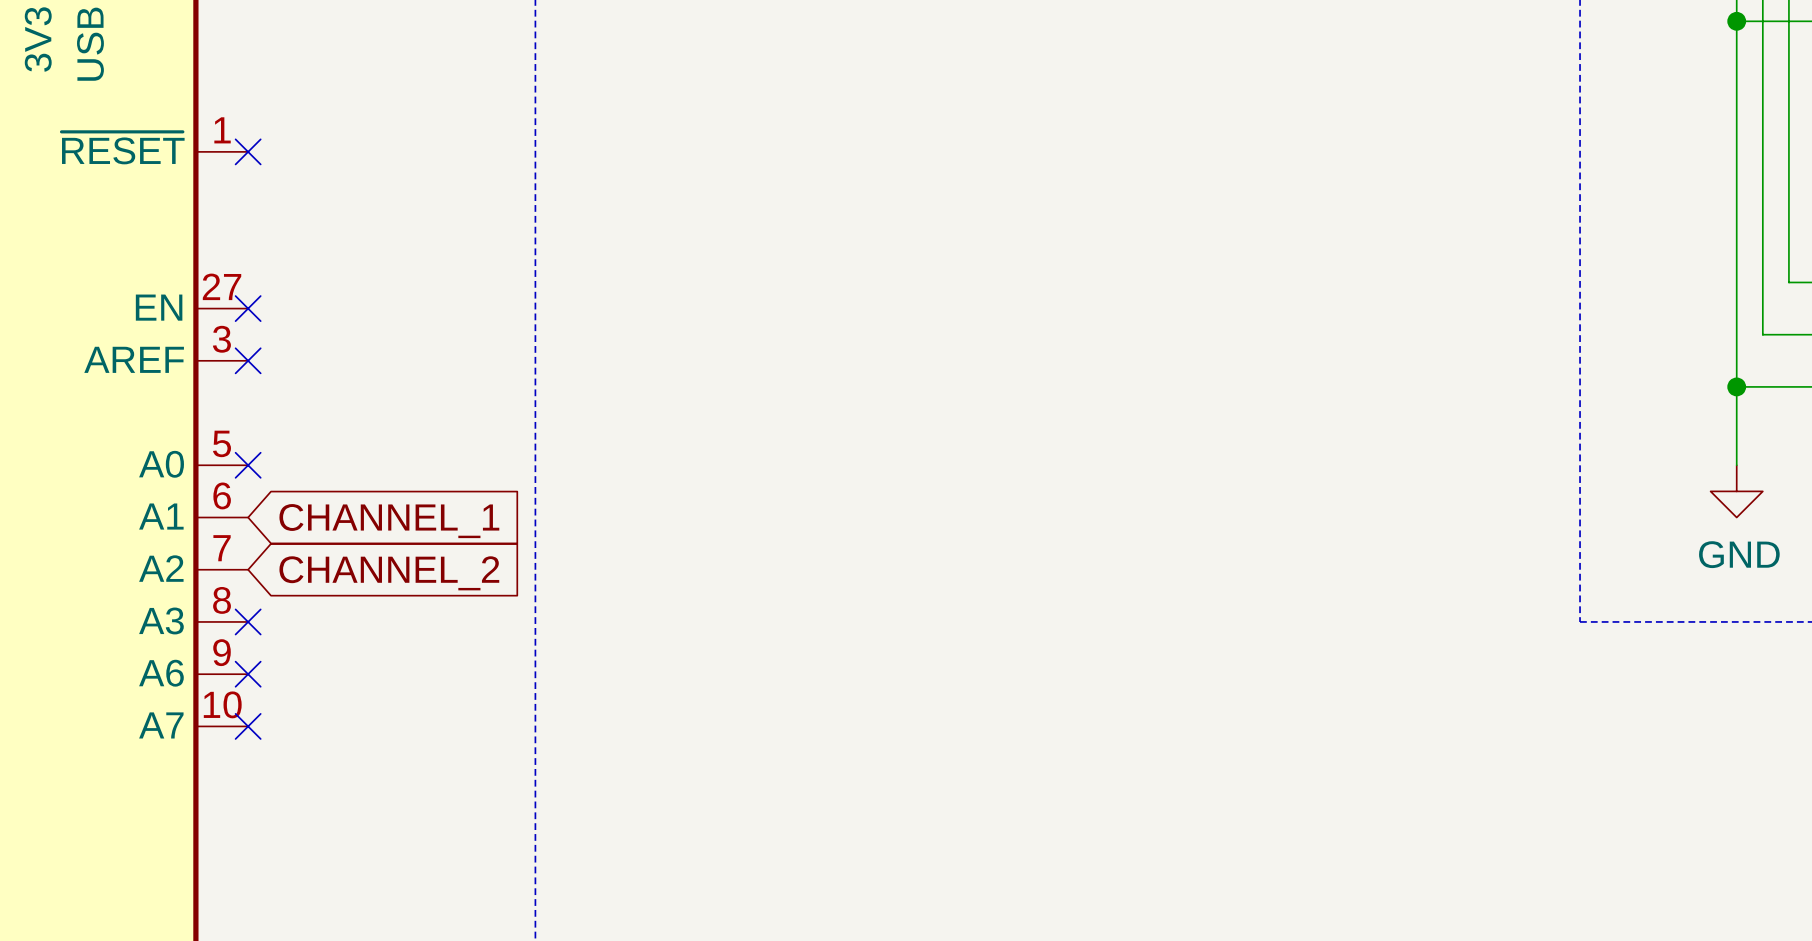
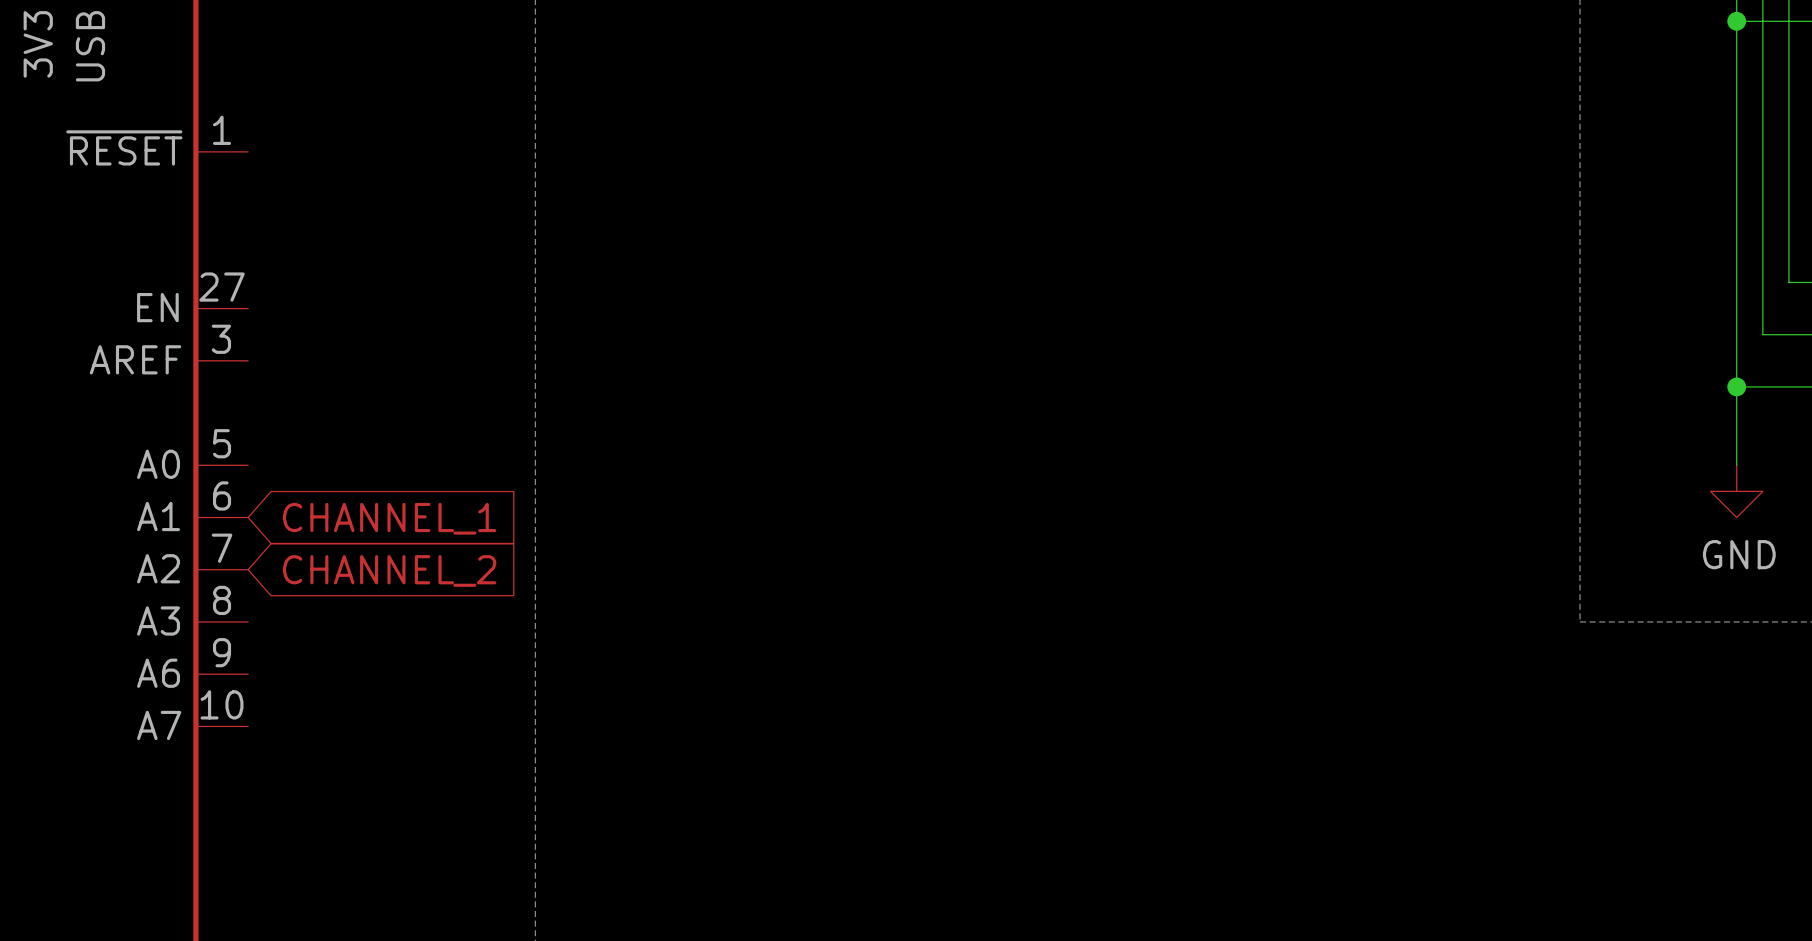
no-connect mark: (248, 151) -> none
no-connect mark: (248, 308) -> none
no-connect mark: (248, 360) -> none
no-connect mark: (248, 465) -> none
no-connect mark: (248, 621) -> none
no-connect mark: (248, 674) -> none
no-connect mark: (248, 726) -> none

